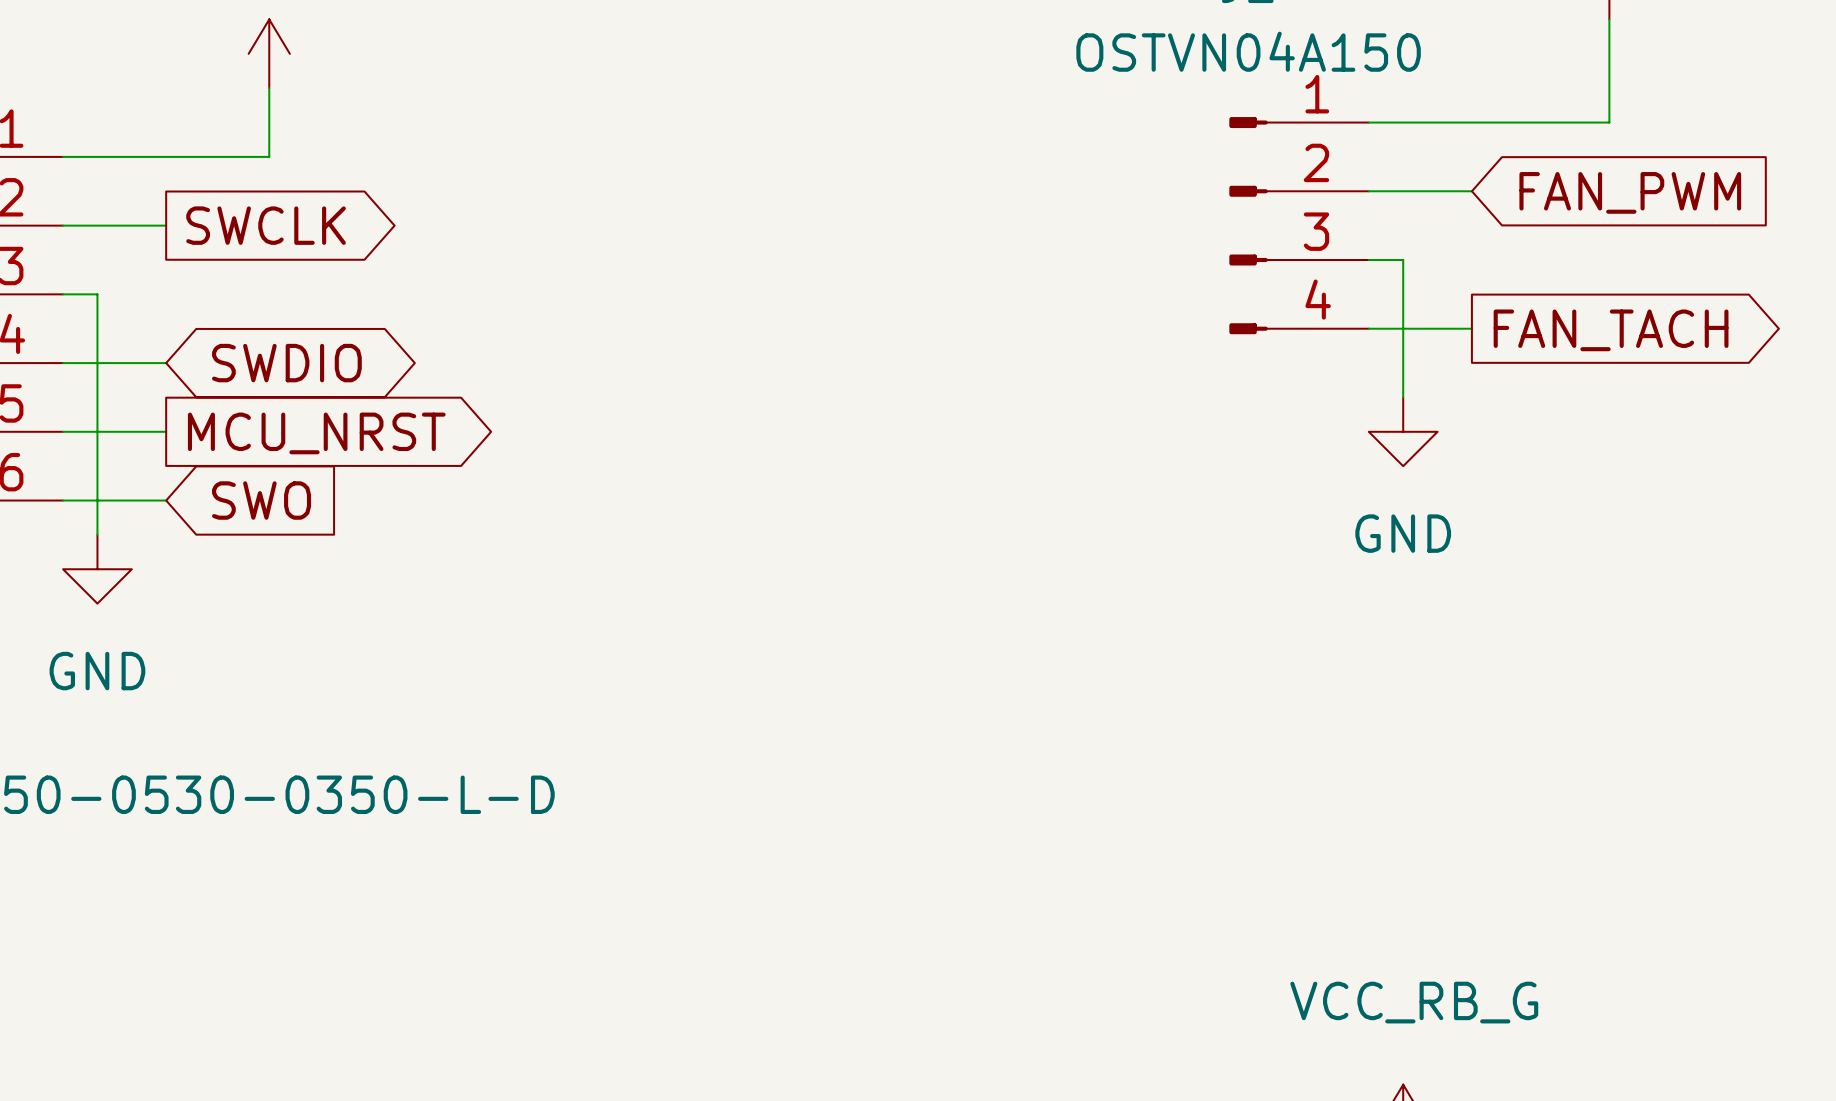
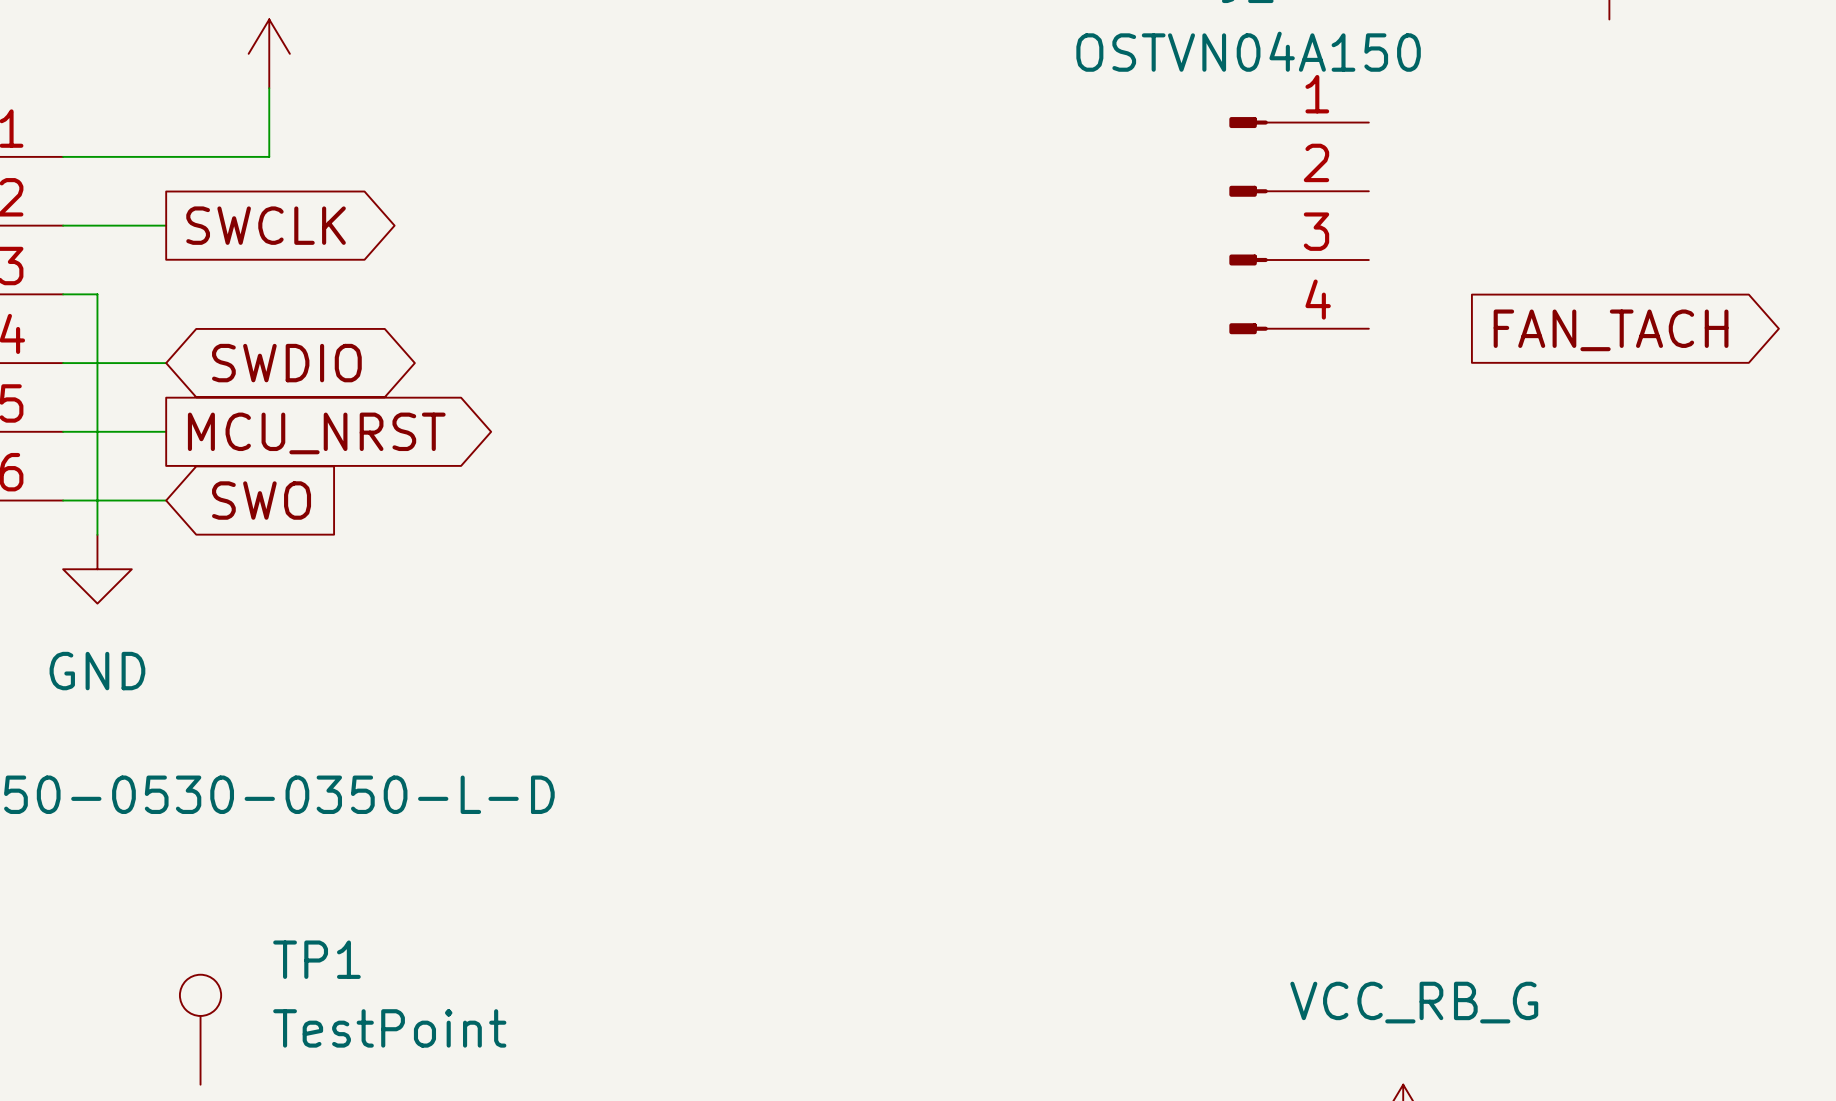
wire: (1609, 19) (1609, 122) (1368, 122) -> none
wire: (1368, 191) (1471, 191) -> none
global label: FAN_PWM (1630, 192) -> none
wire: (1368, 259) (1403, 259) (1403, 397) -> none
wire: (1368, 328) (1471, 328) -> none
power symbol: GND (1403, 431) -> none
TP1: none -> TestPoint (200, 1029)

